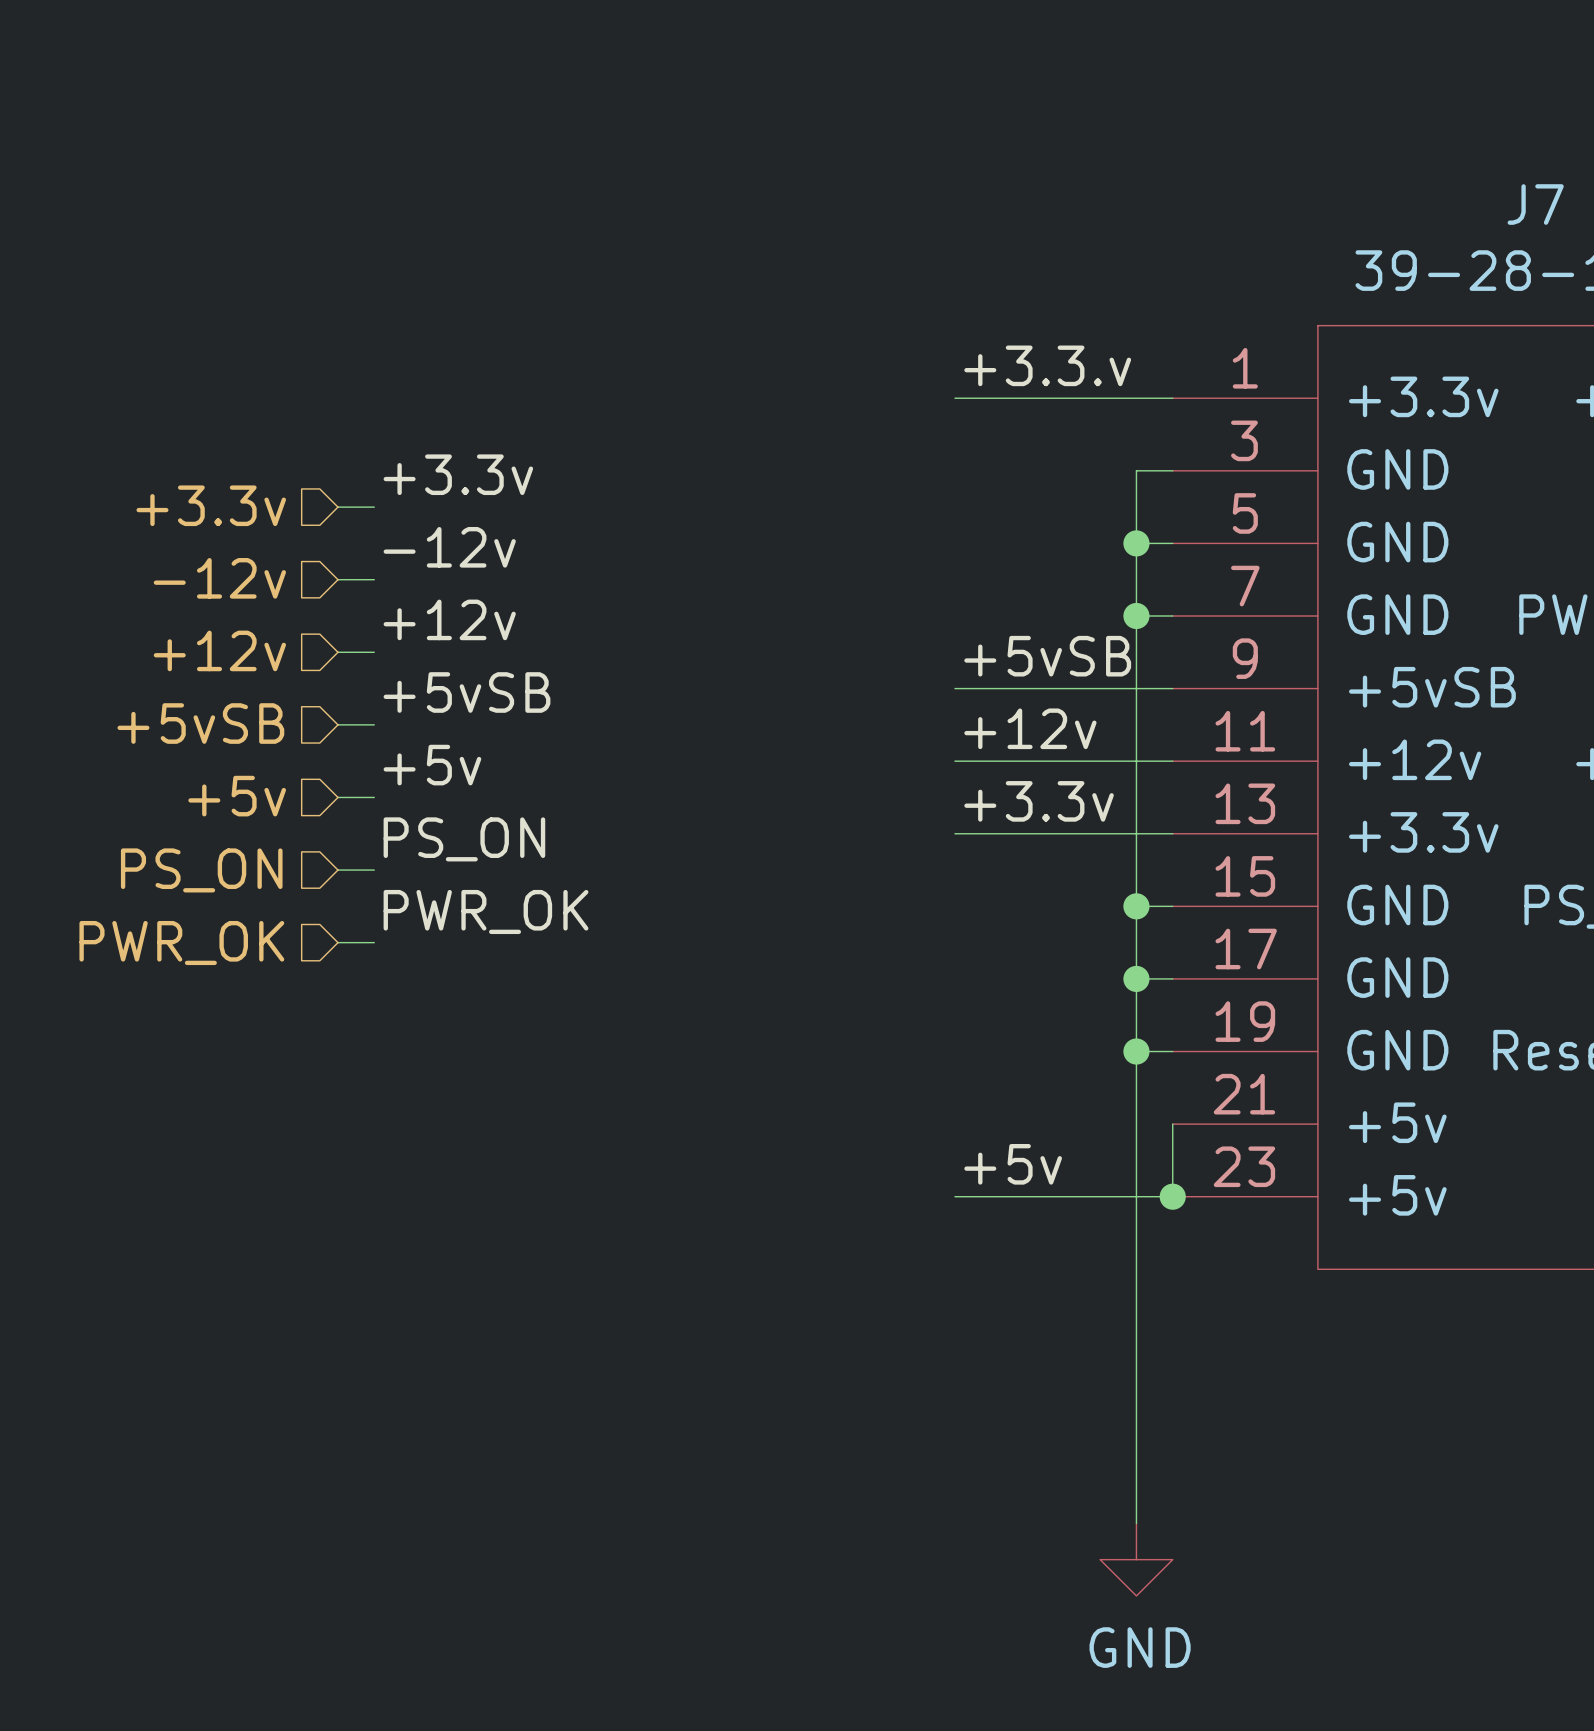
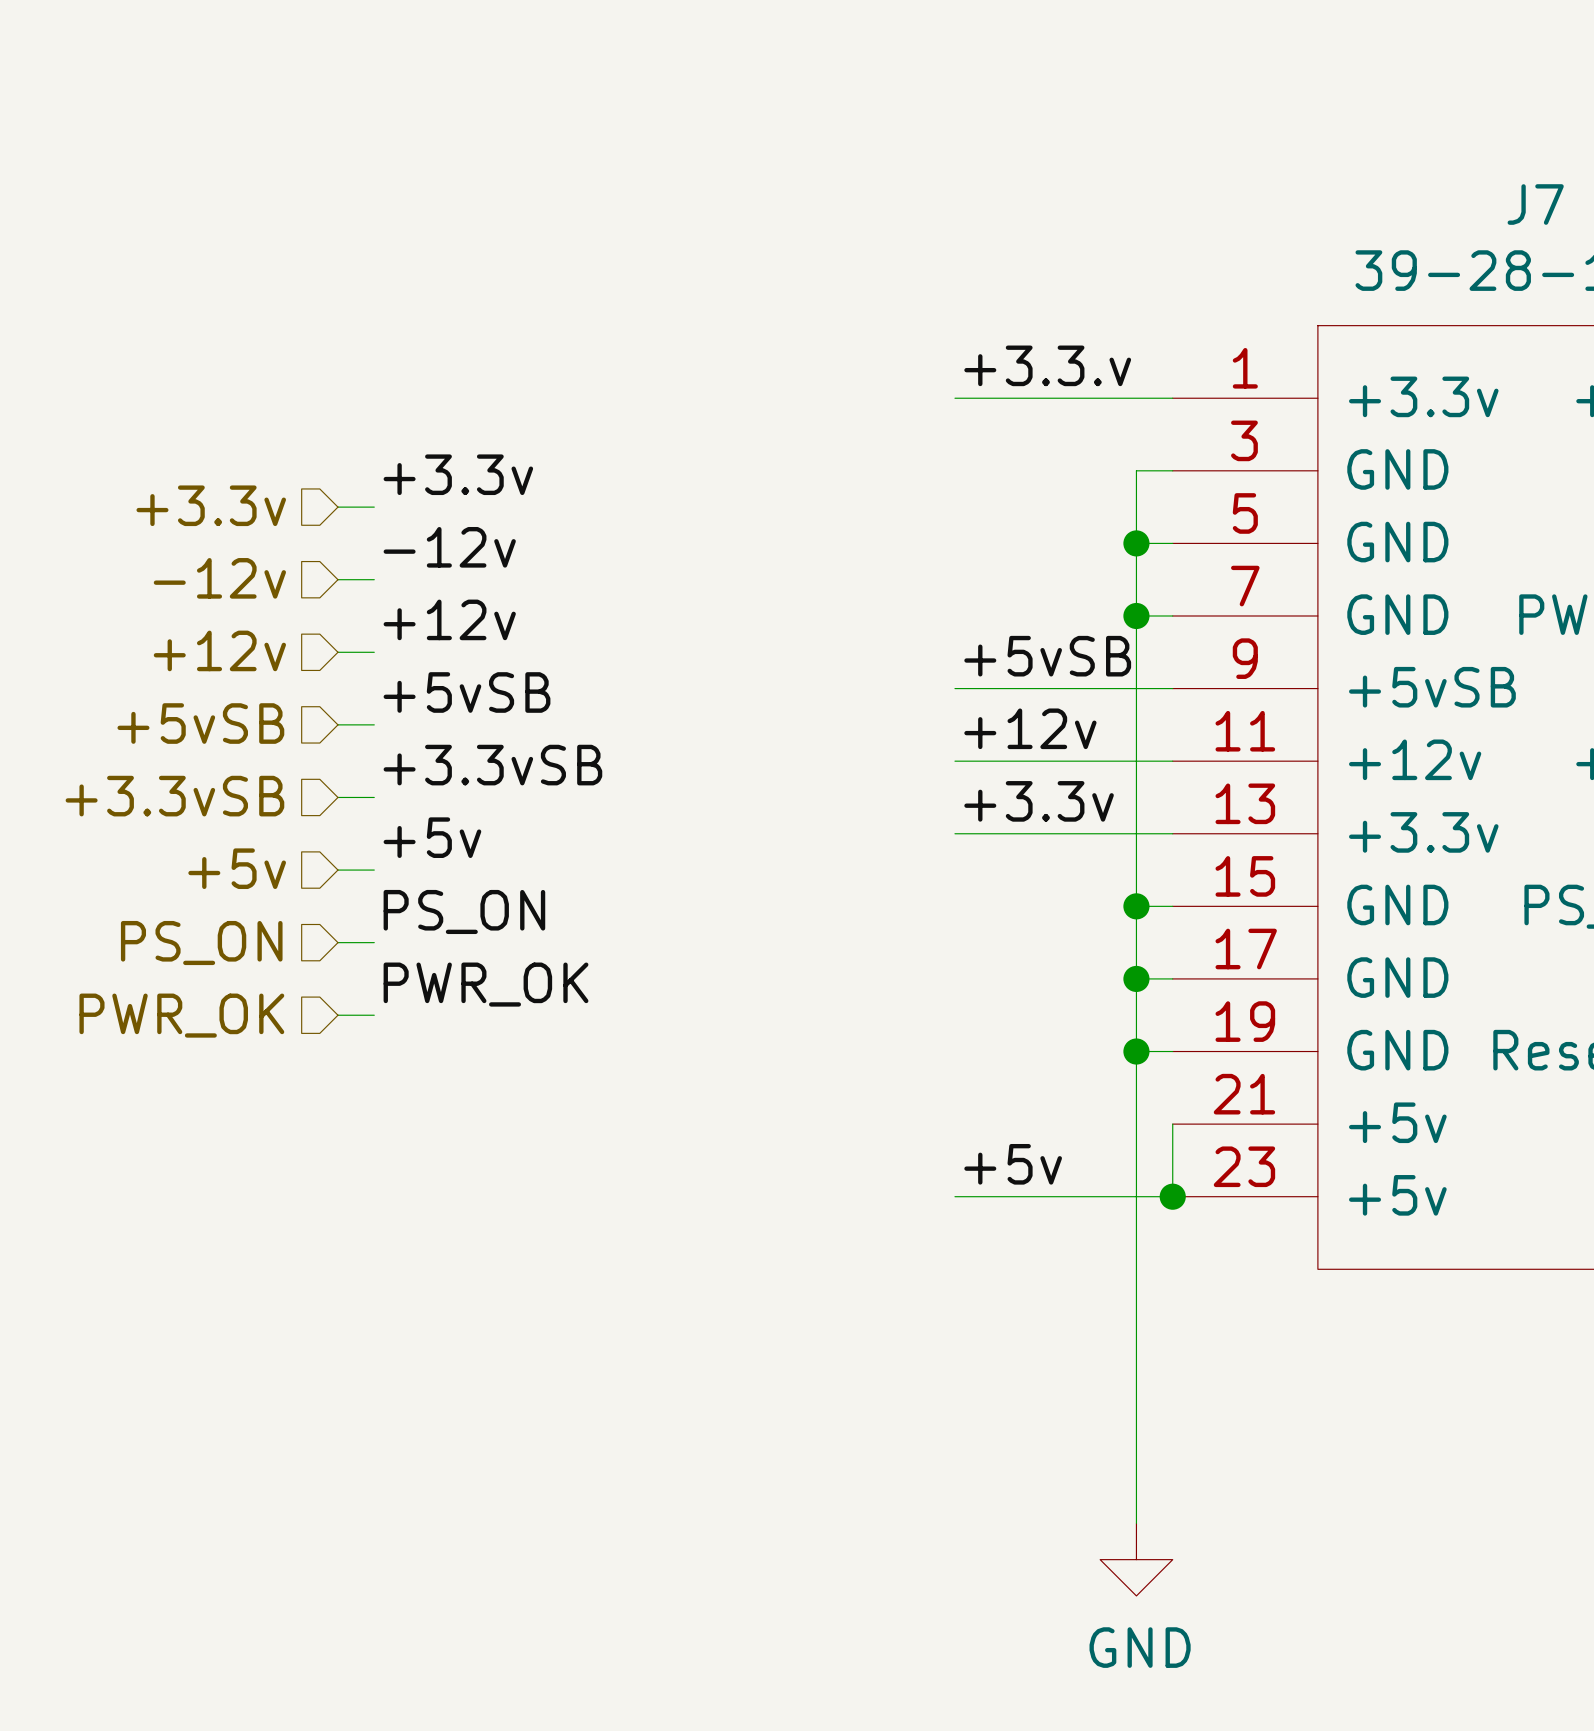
label: +5v (432, 765) -> +3.3vSB (492, 765)
hierarchical label: +5v (237, 796) -> +3.3vSB (174, 796)
label: PS_ON (464, 839) -> +5v (432, 837)
hierarchical label: PS_ON (201, 870) -> +5v (237, 868)
label: PWR_OK (486, 911) -> PS_ON (464, 911)
hierarchical label: PWR_OK (181, 943) -> PS_ON (201, 943)
label: none -> PWR_OK (486, 984)
hierarchical label: none -> PWR_OK (181, 1015)
wire: none -> (337, 1015) (374, 1015)

